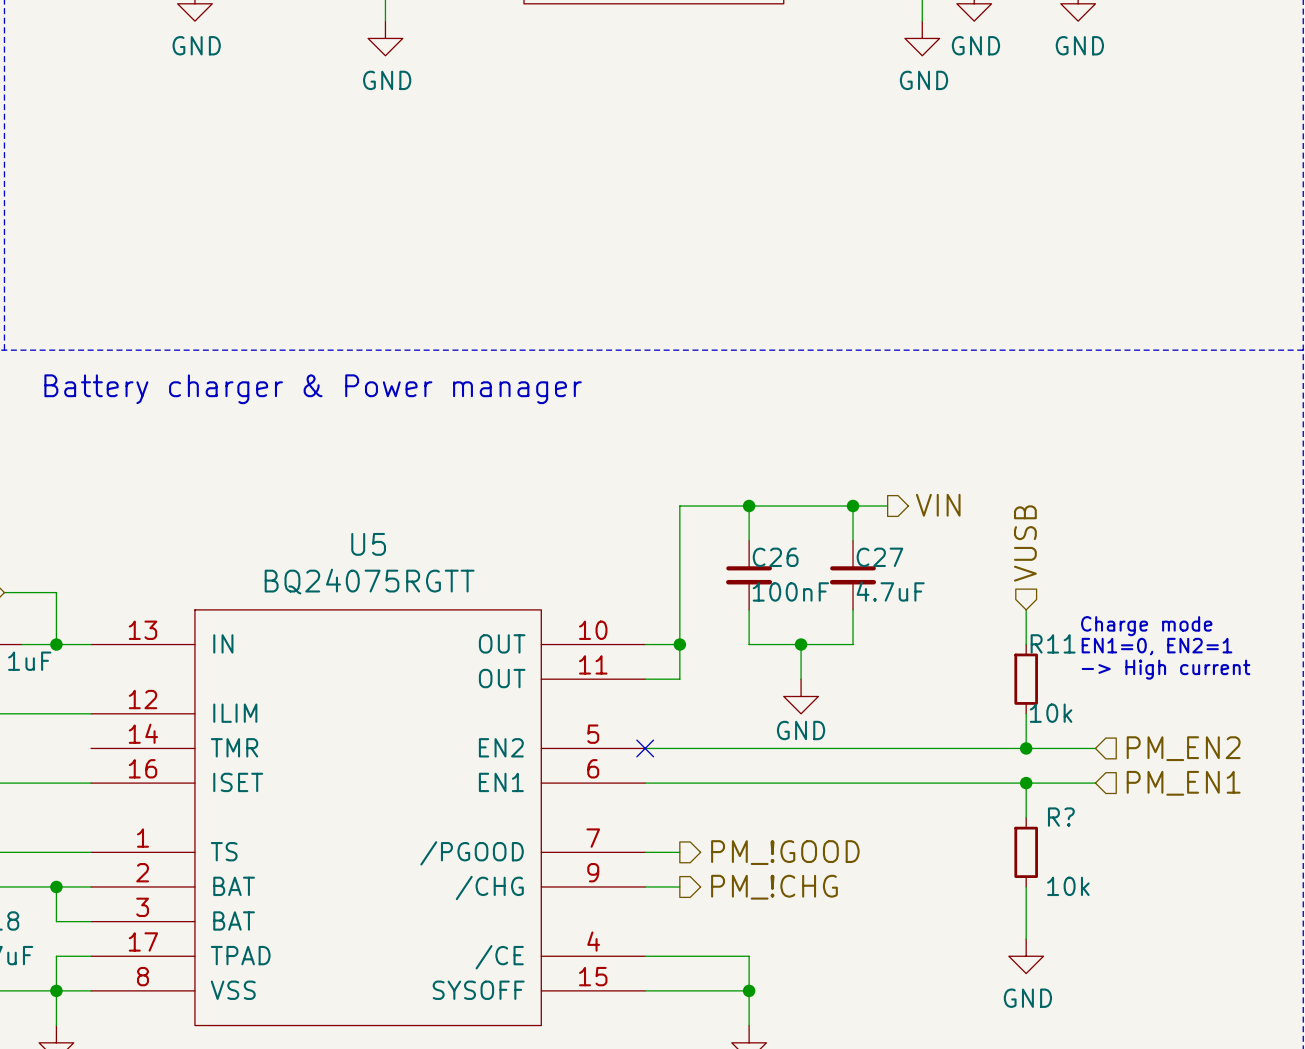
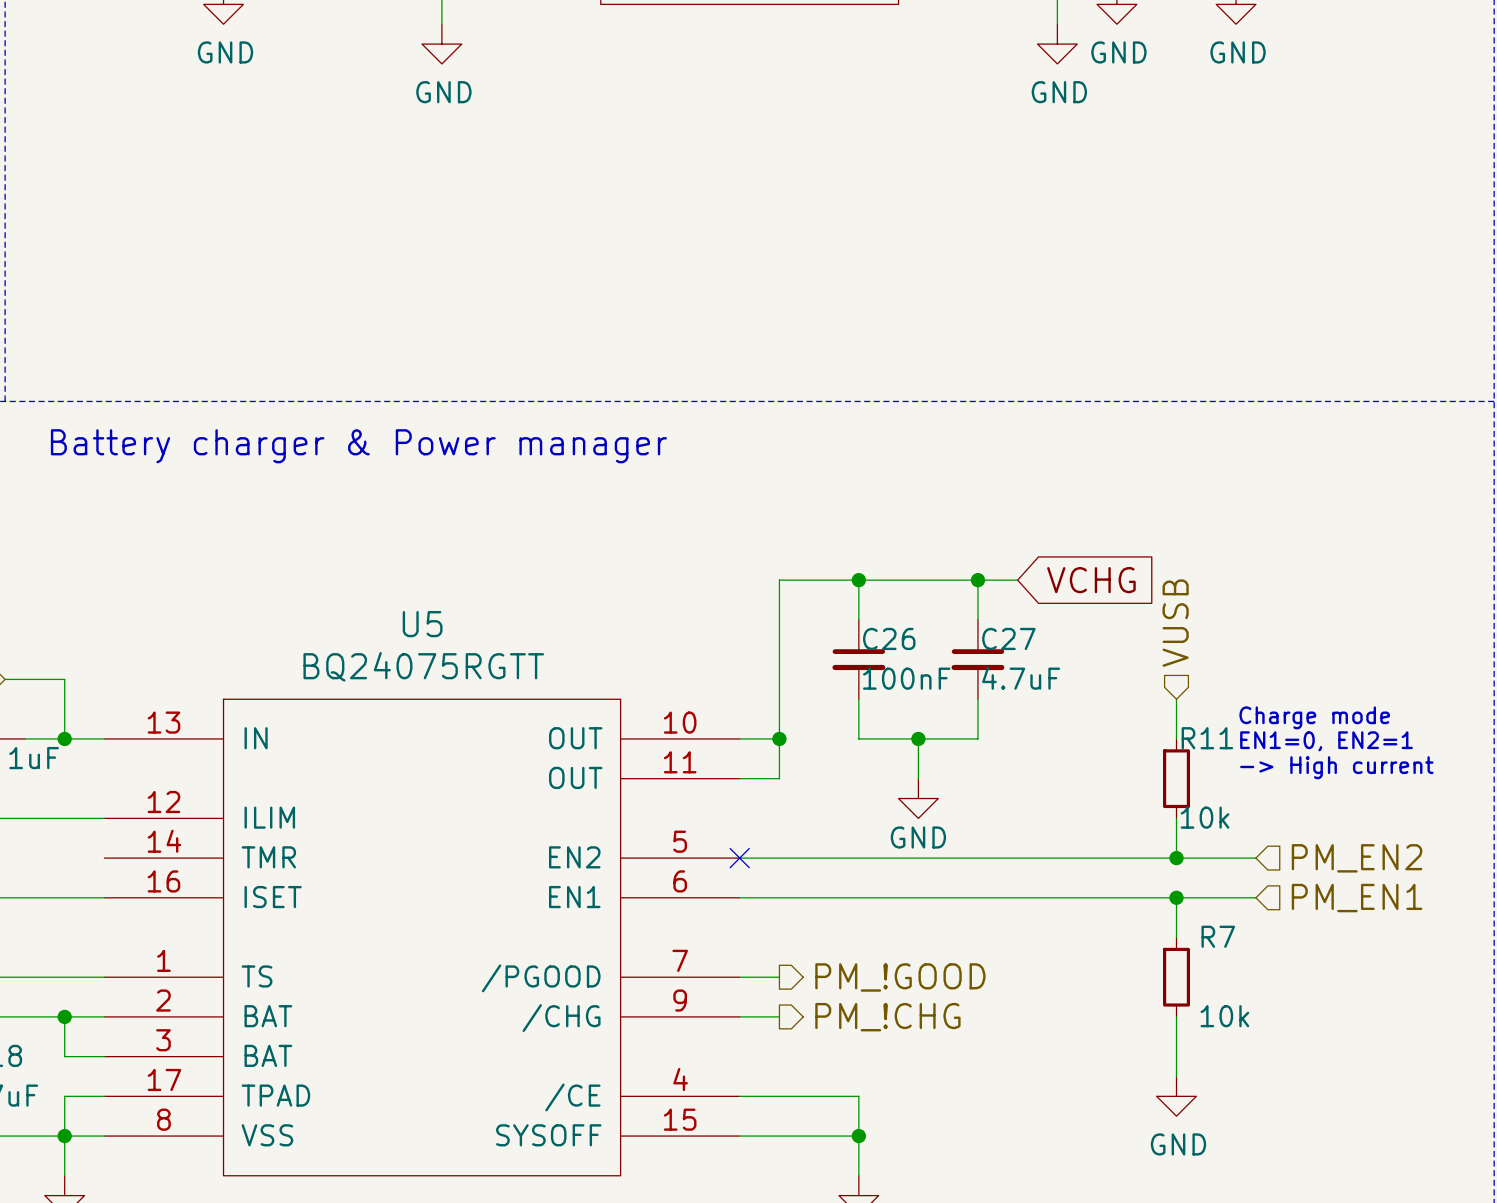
hierarchical label: VIN (938, 505) -> none
global label: none -> VCHG (1091, 580)
R? name: R? (1061, 817) -> R7 (1218, 936)

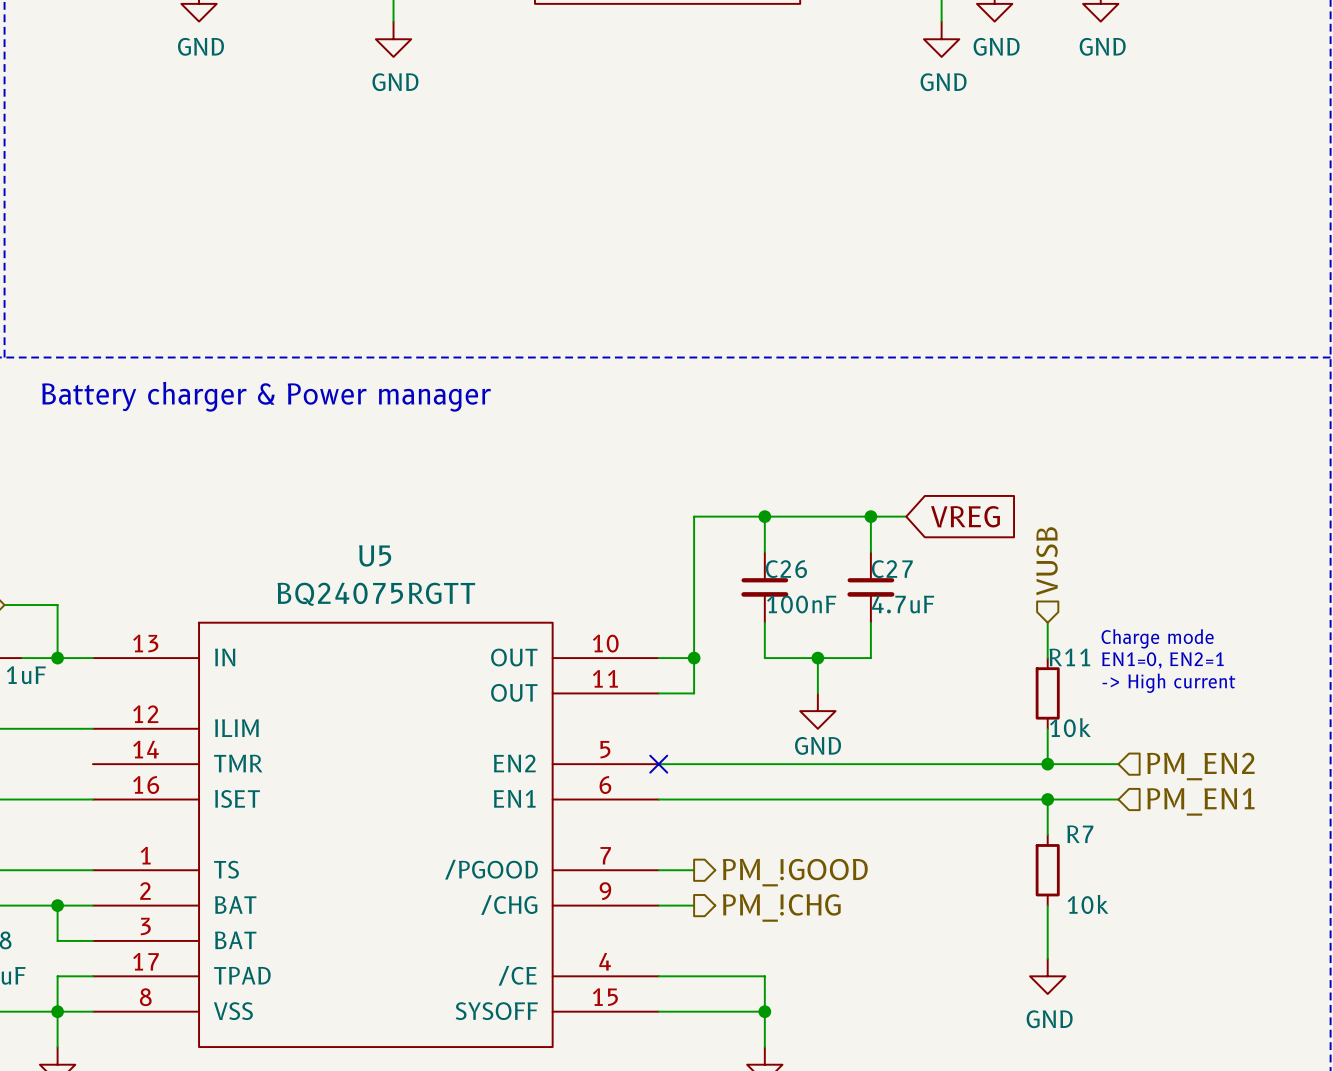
global label: VCHG (1091, 580) -> VREG (965, 516)

